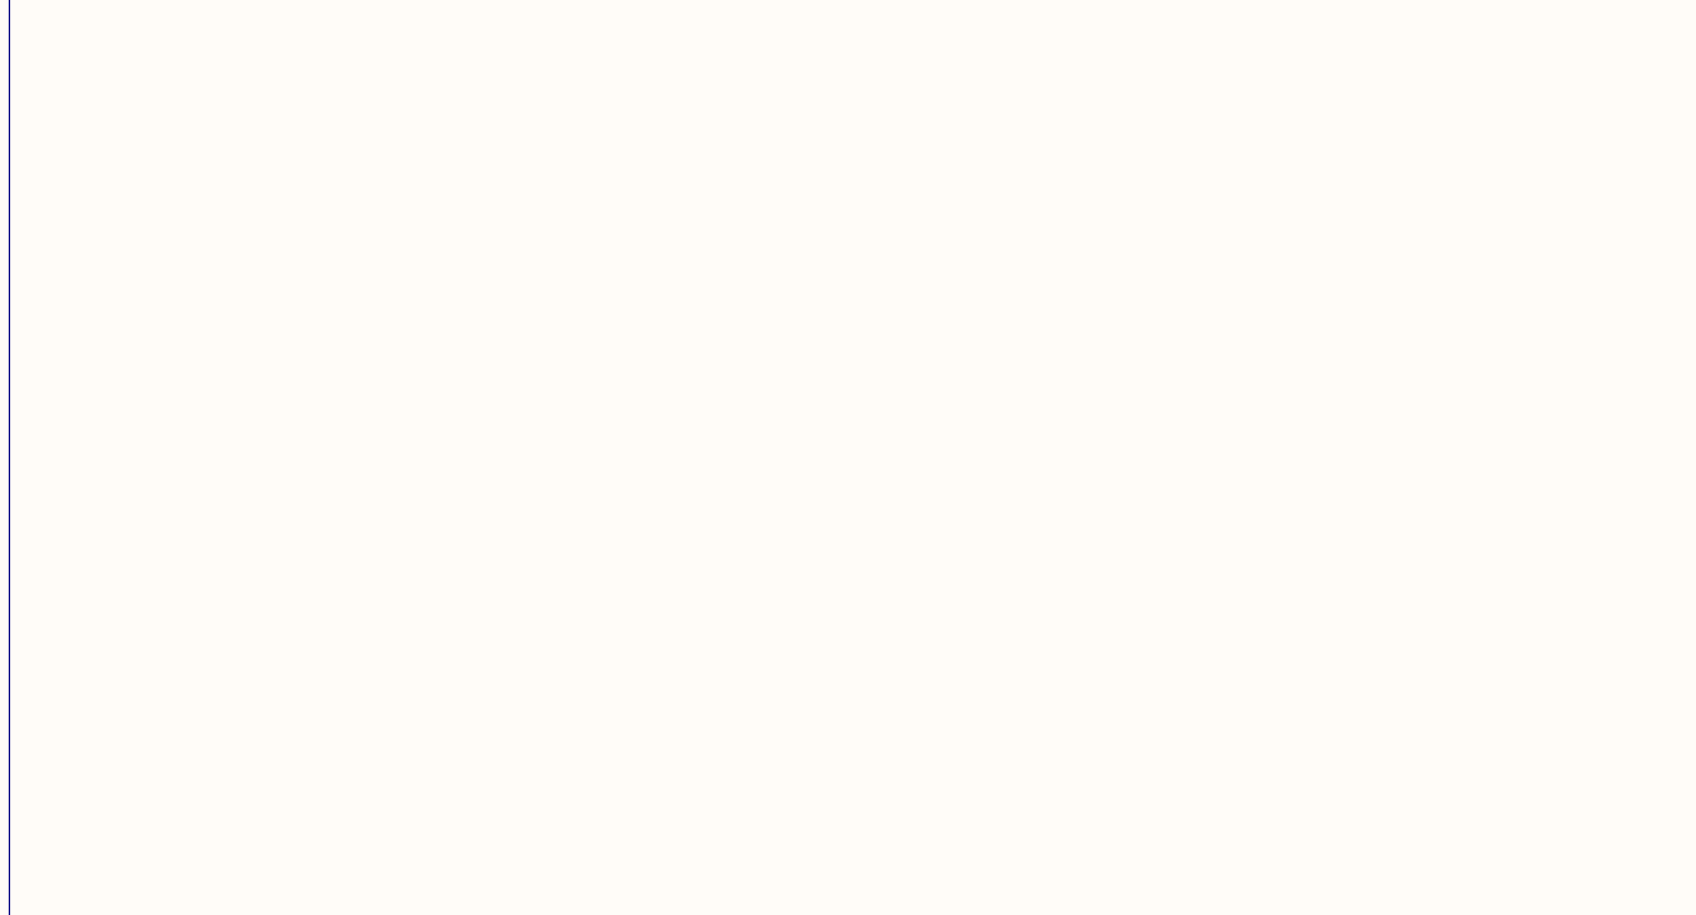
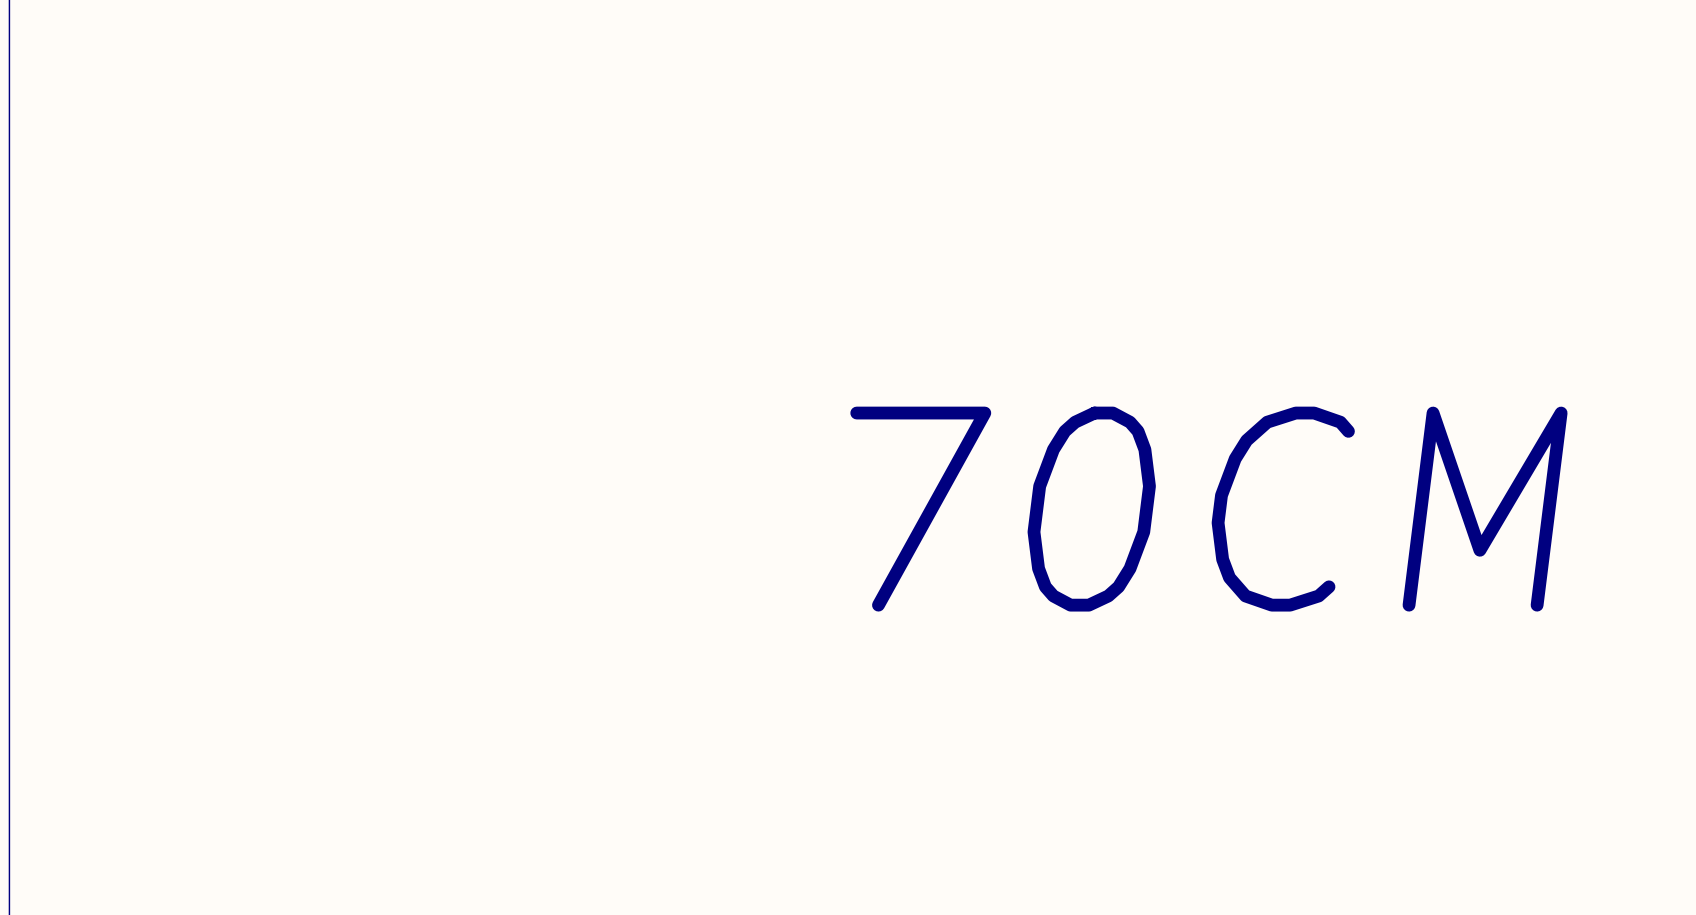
text: none -> 70CM (1208, 509)

